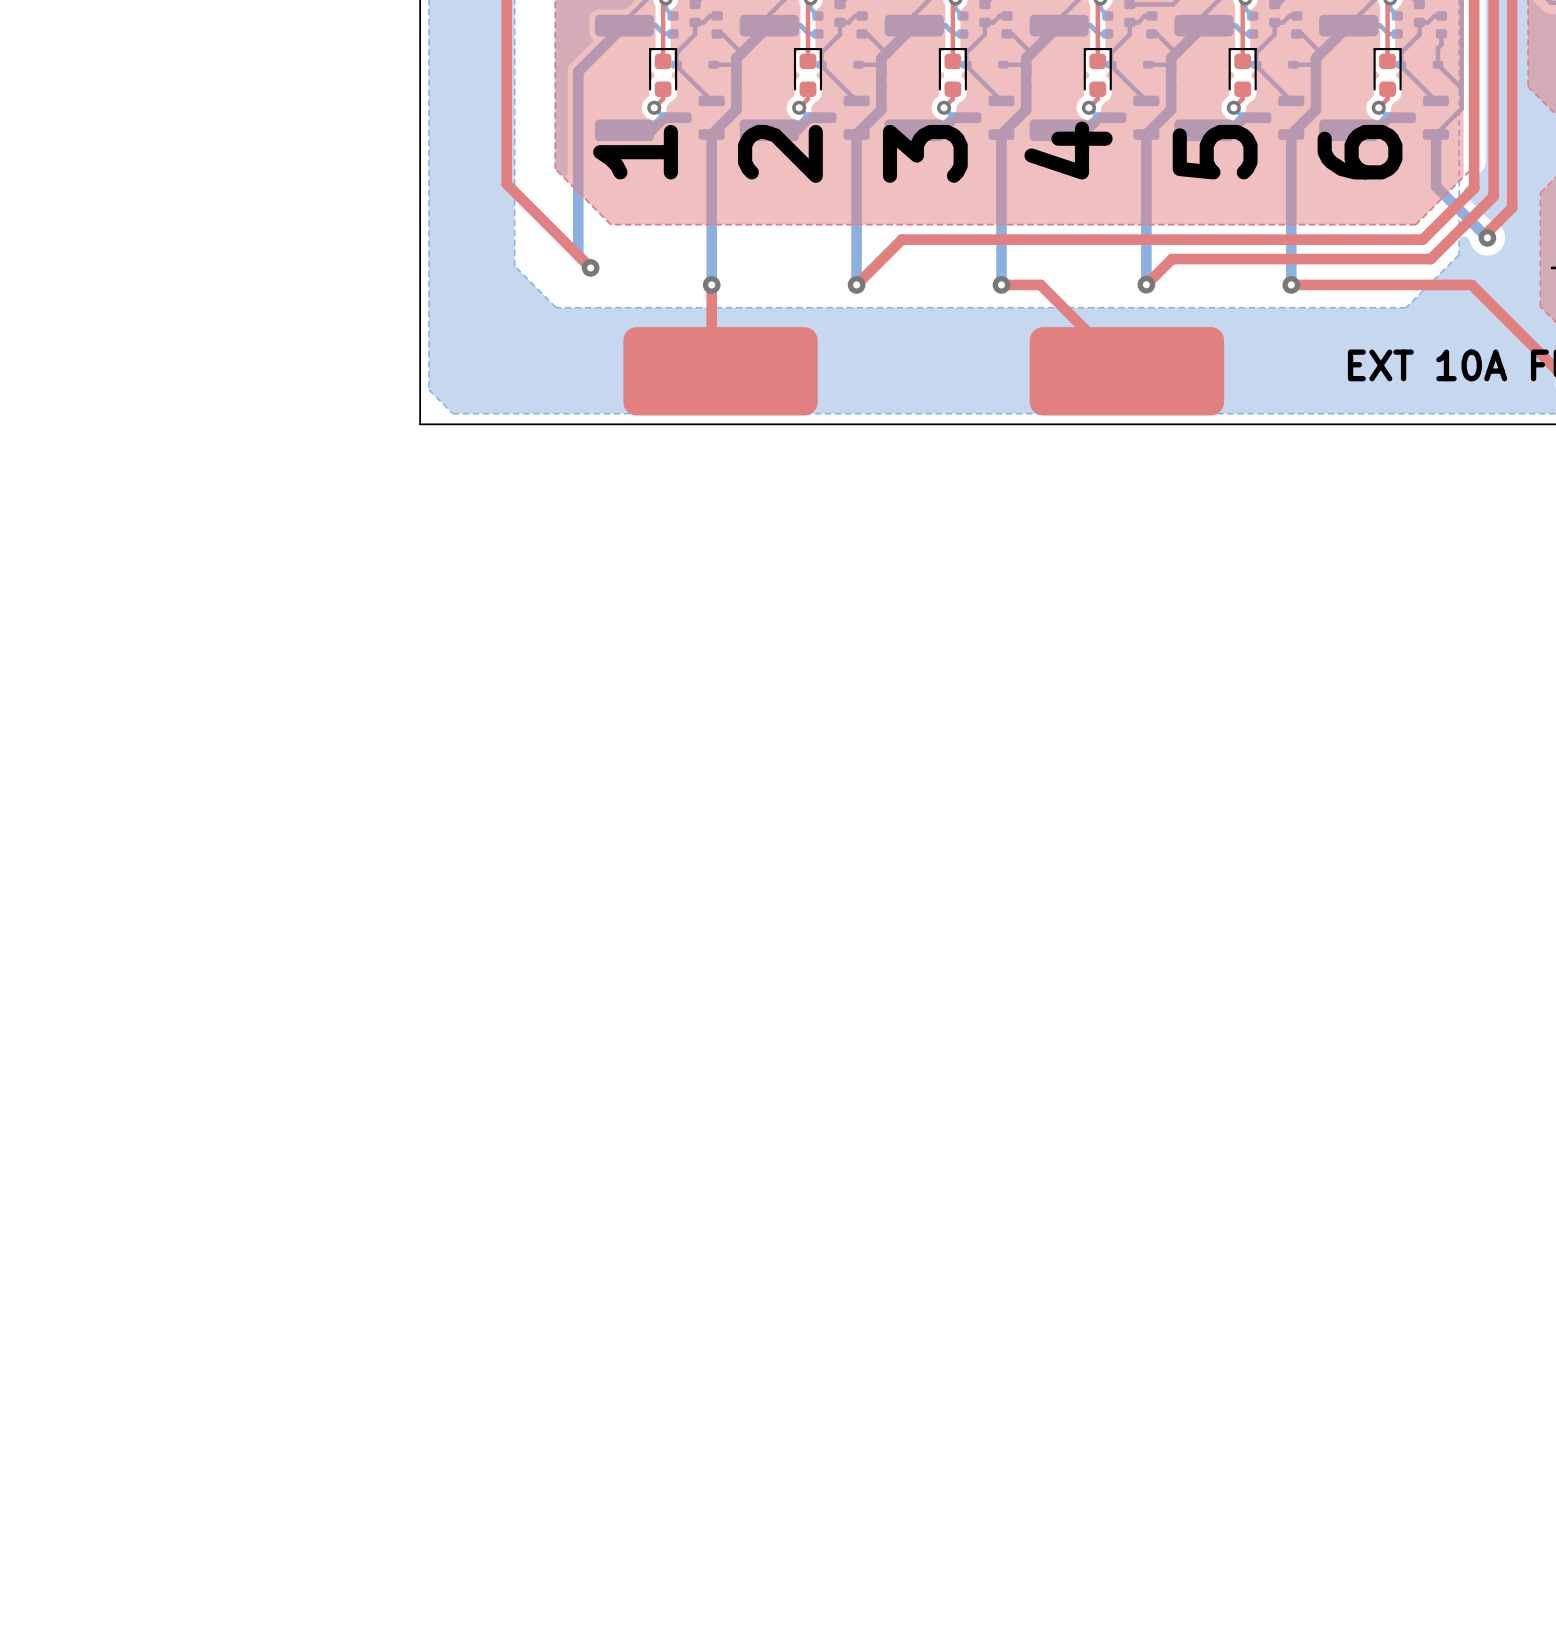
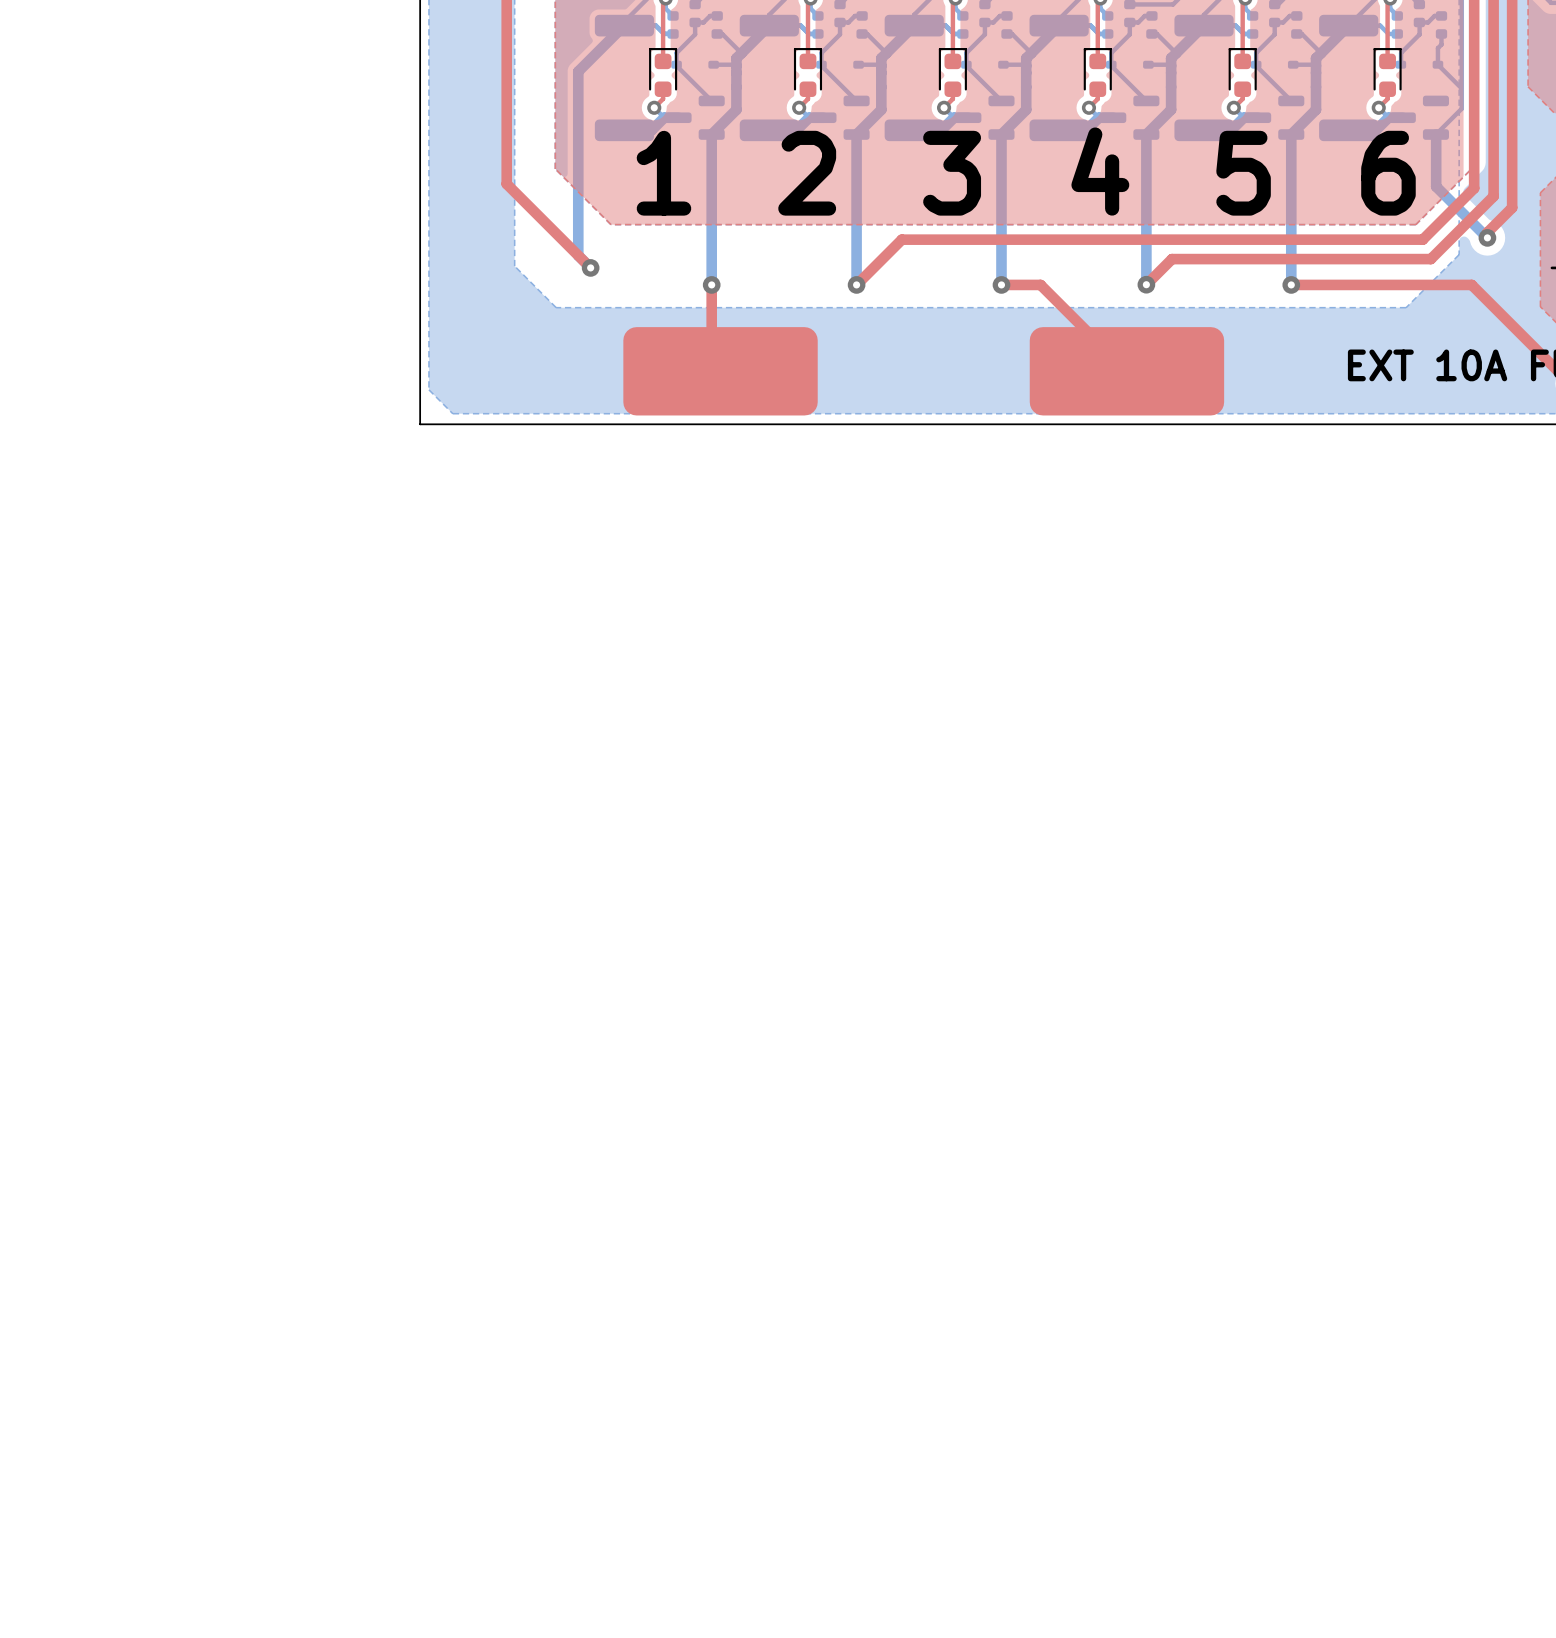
bottom track: (1400, 64) (1435, 100) -> none
text rotation: 0° (1068, 150) -> 90° clockwise (1100, 171)
text rotation: 0° (635, 152) -> 90° clockwise (663, 173)
text rotation: 0° (1215, 152) -> 90° clockwise (1243, 173)
text rotation: 0° (1360, 152) -> 90° clockwise (1388, 173)
text rotation: 0° (780, 153) -> 90° clockwise (807, 173)
text rotation: 0° (925, 153) -> 90° clockwise (952, 173)

